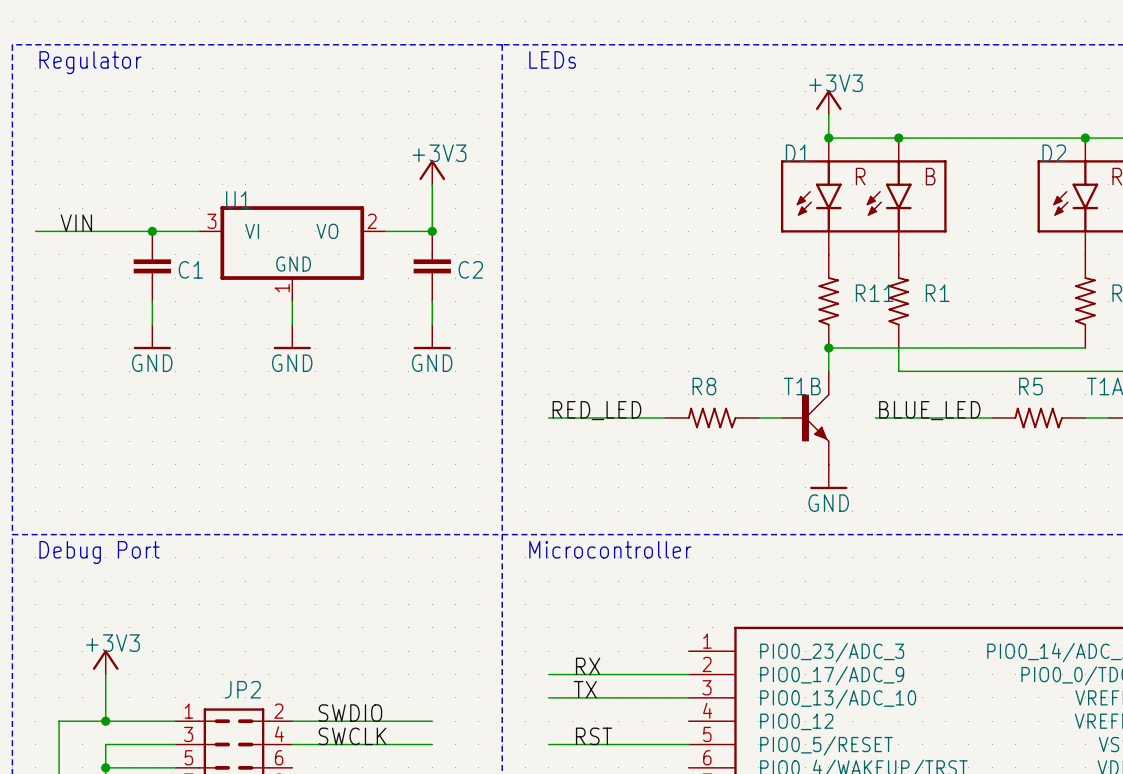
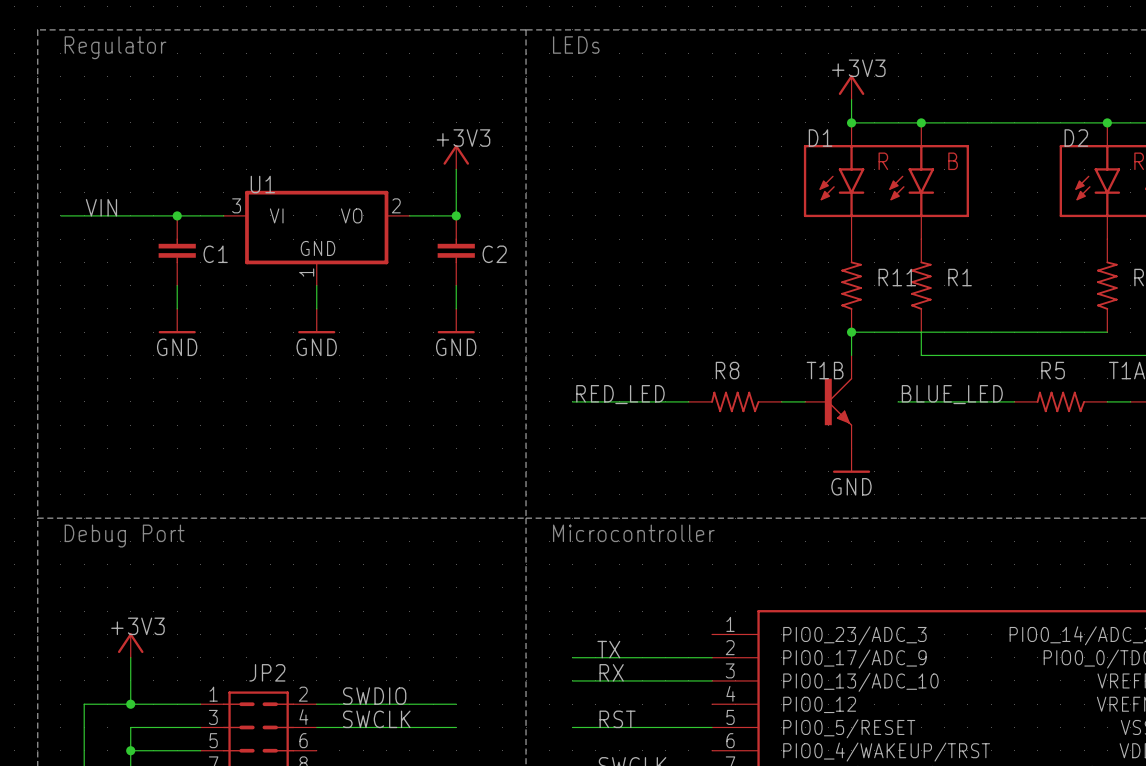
label: RX (588, 666) -> TX (608, 649)
label: TX (585, 689) -> RX (611, 672)

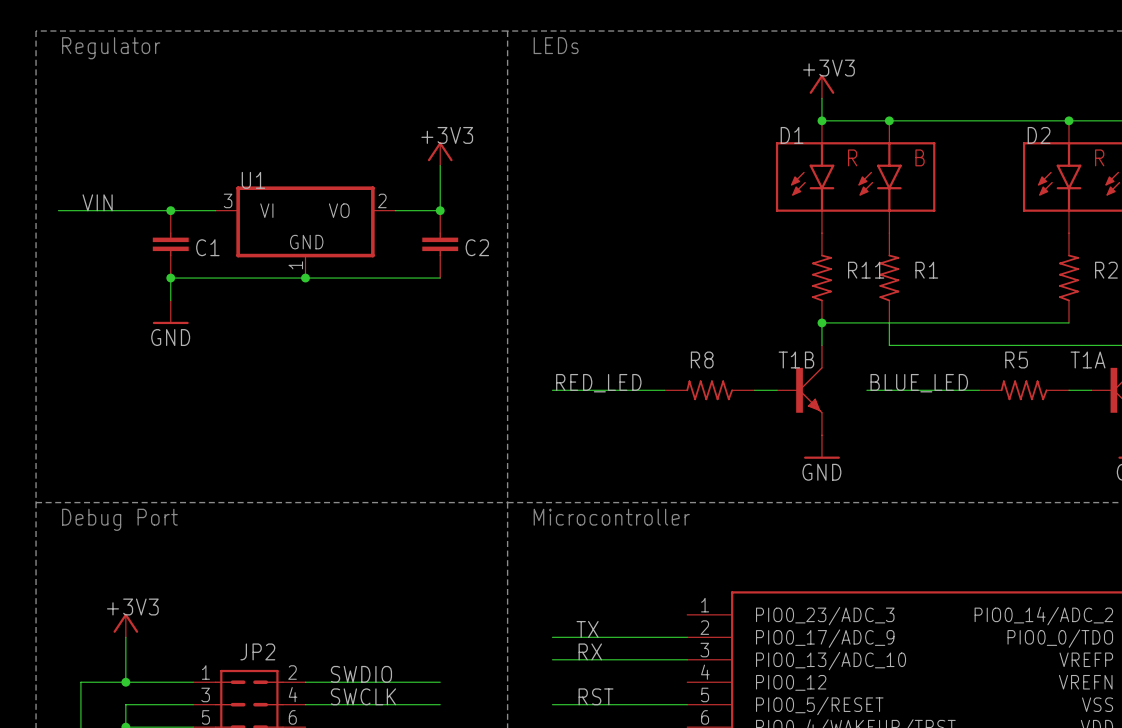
junction: none -> (170, 278)
wire: (316, 285) (316, 308) -> none
junction: none -> (305, 278)
wire: (456, 285) (456, 308) -> (440, 278) (170, 278)
power symbol: GND (316, 321) -> none
power symbol: GND (456, 321) -> none

